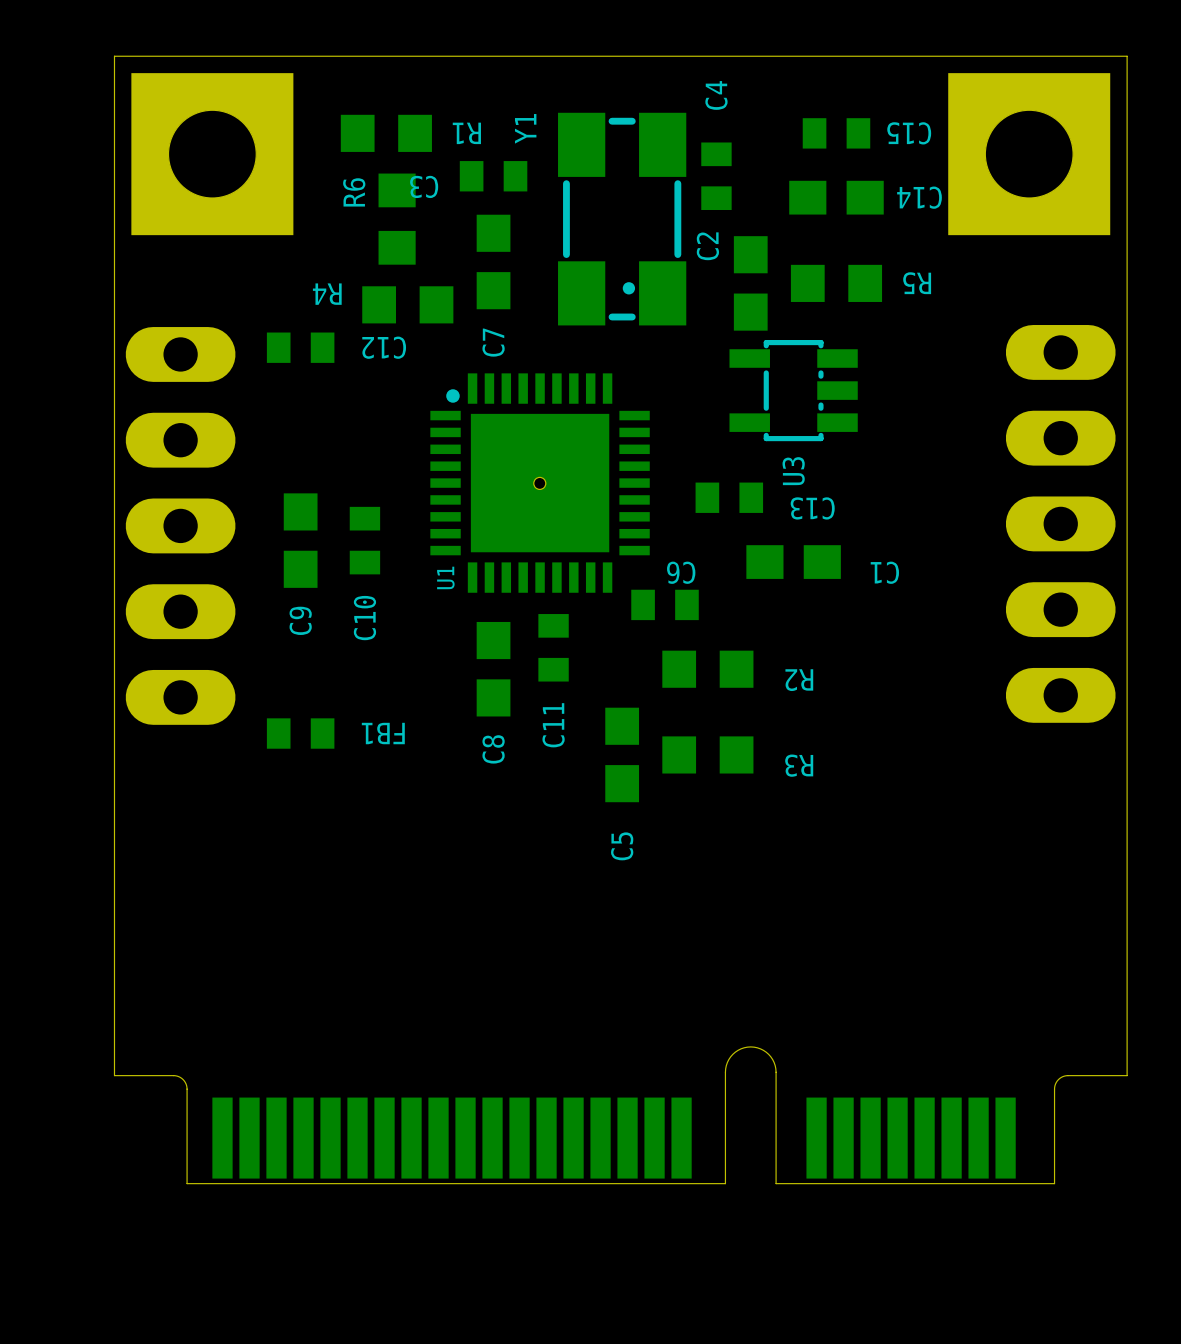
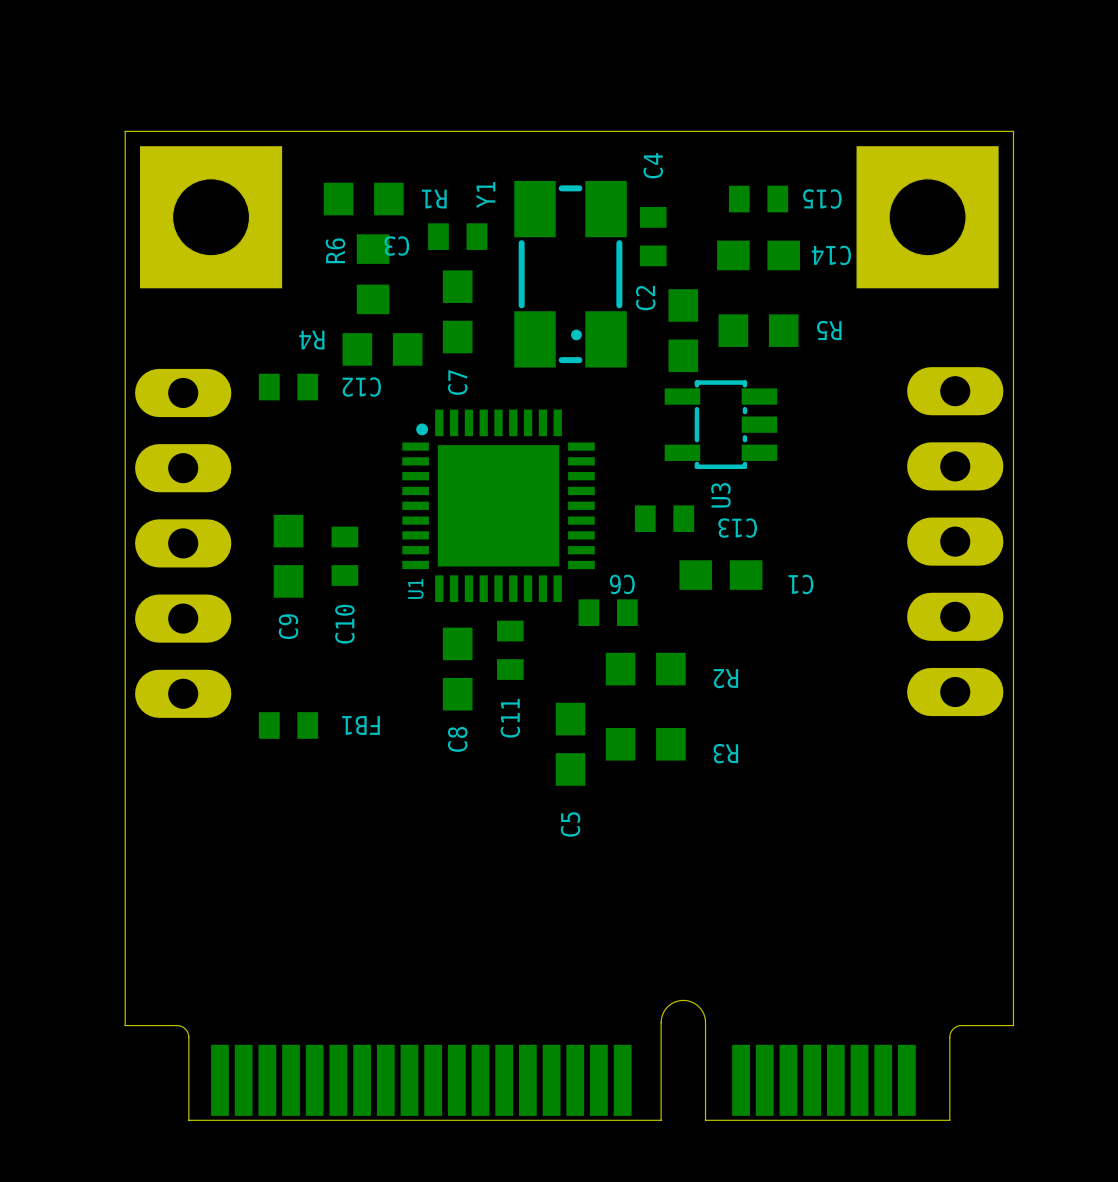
hole: (539, 483) -> none

